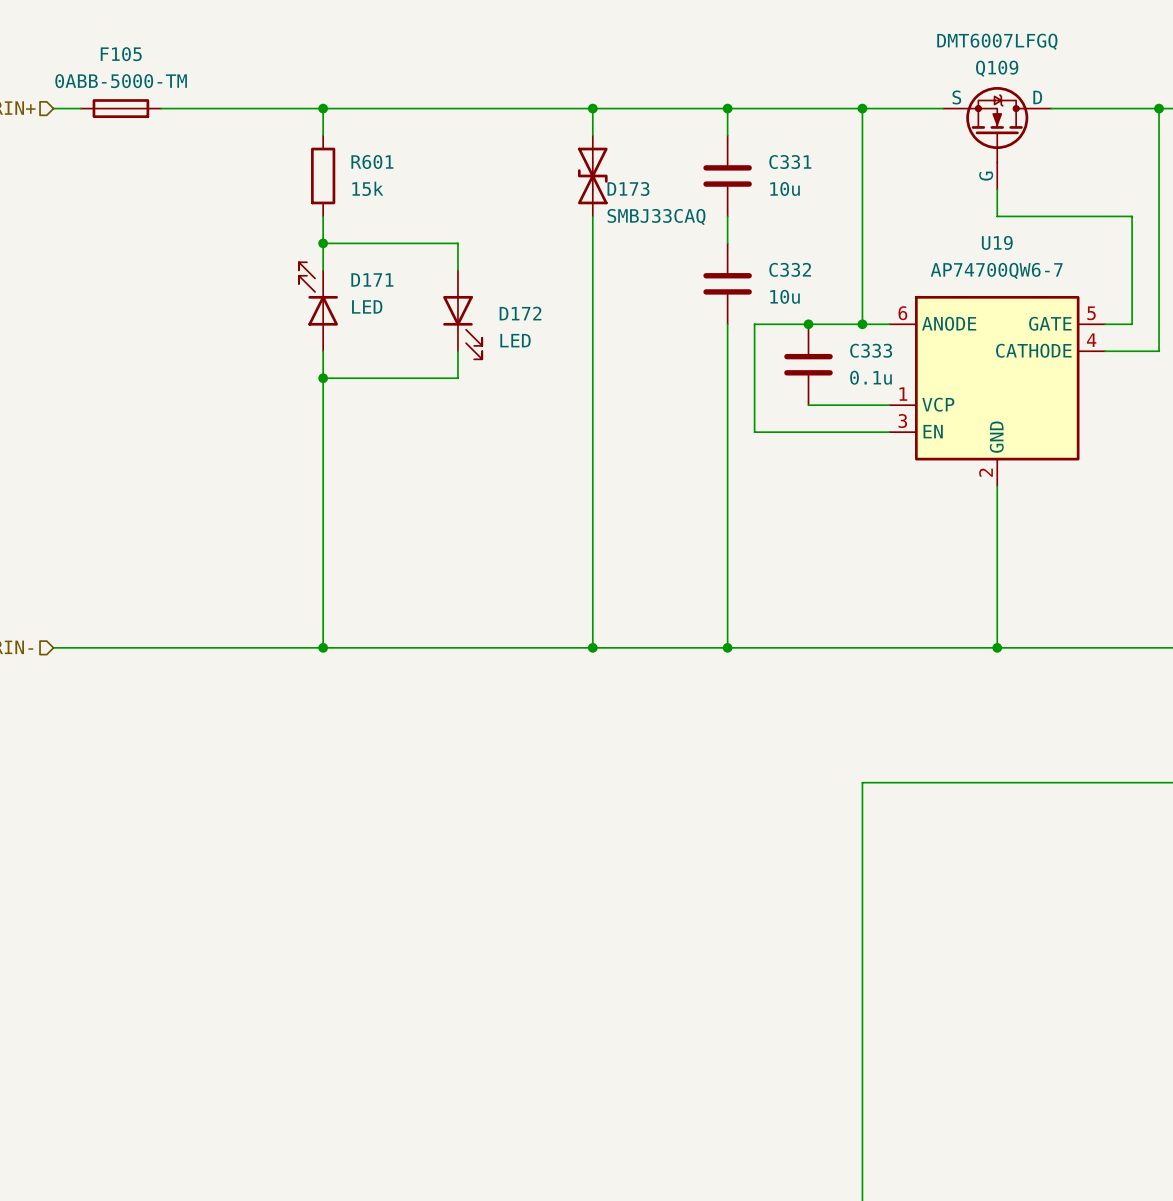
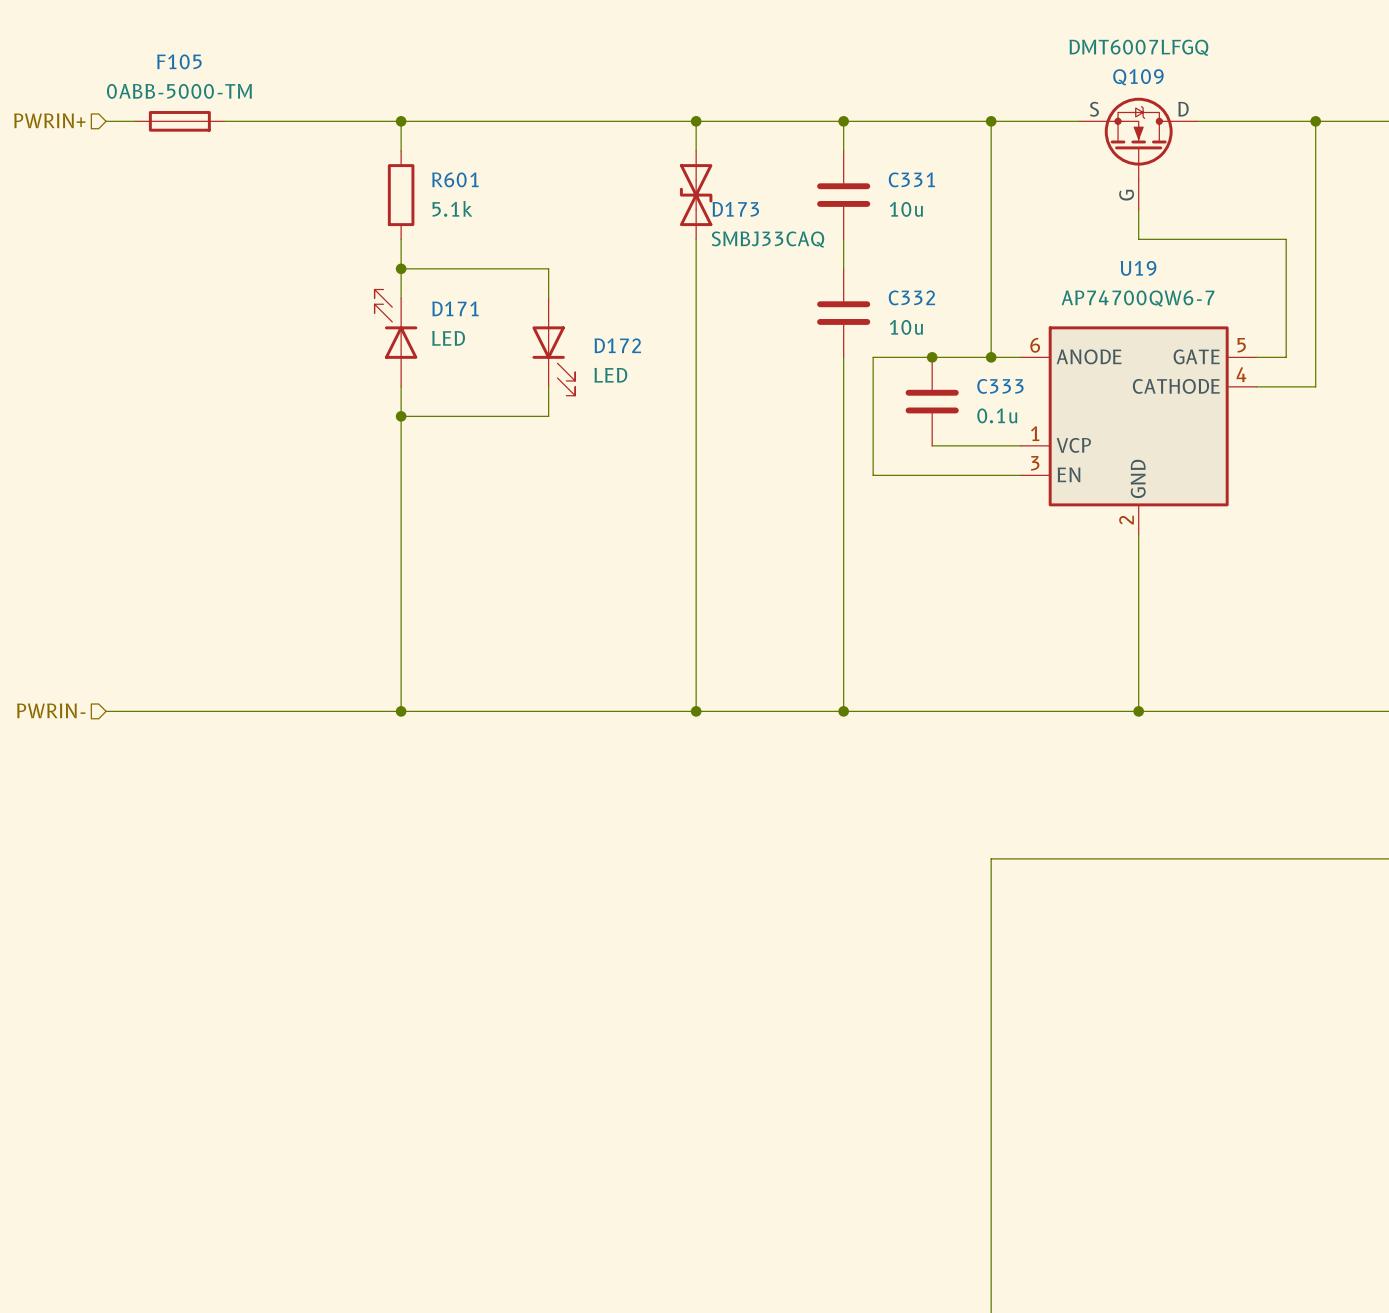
R601 value: 15k (367, 188) -> 5.1k (452, 208)

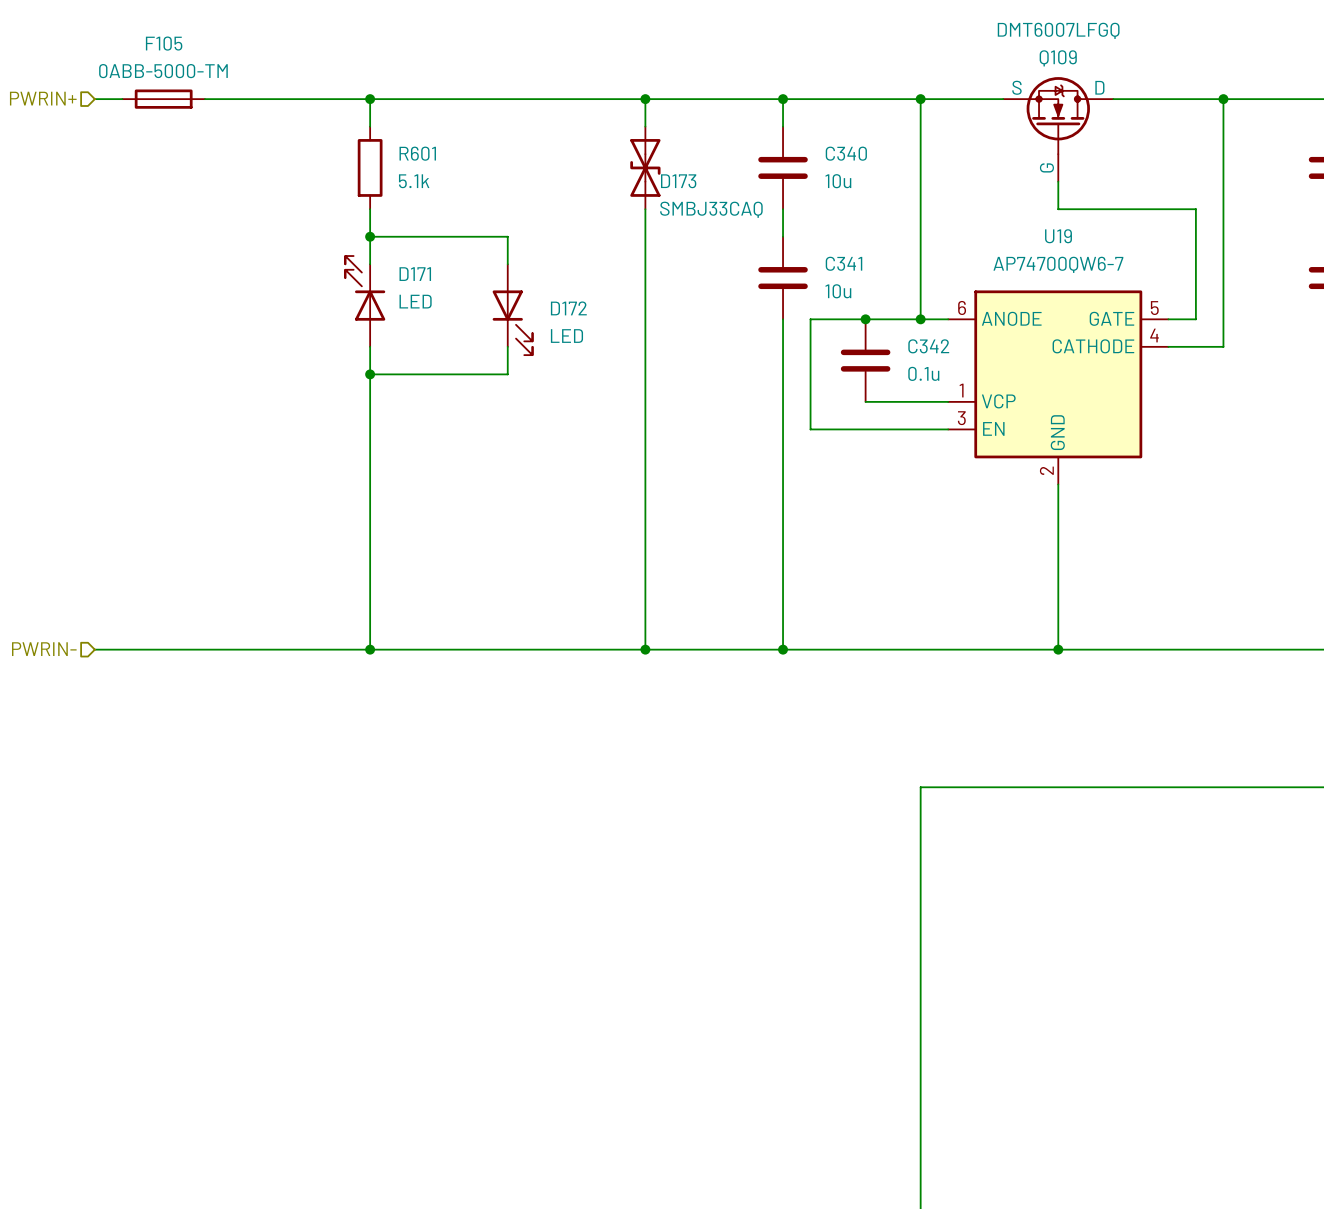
C331 name: C331 (911, 179) -> C340 (846, 153)
C332 name: C332 (911, 297) -> C341 (844, 263)
C333 name: C333 (1000, 386) -> C342 (928, 346)

